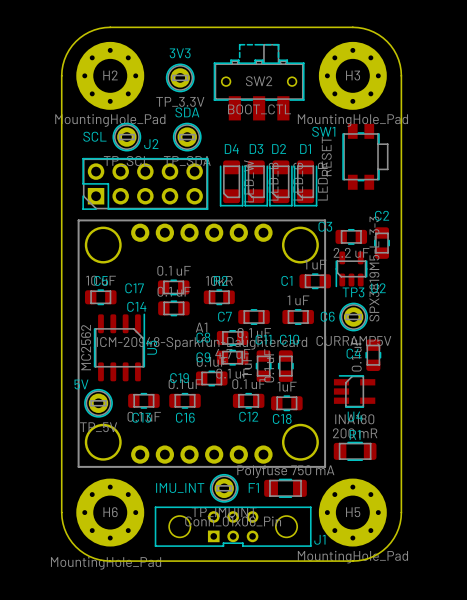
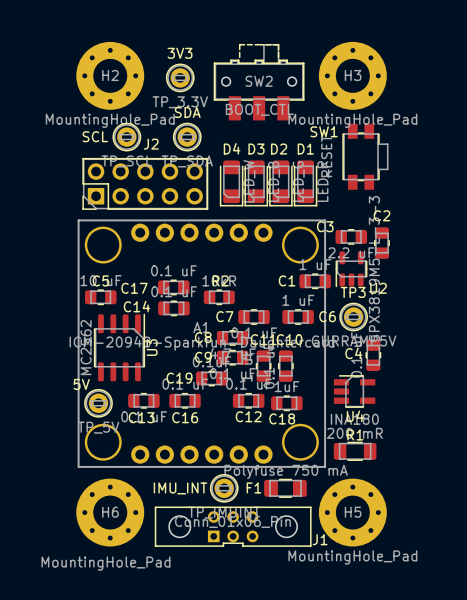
board edge: (110, 27) (358, 27) (368, 30) (383, 37) (396, 54) (401, 75) (401, 512) (398, 528) (393, 538) (383, 550) (373, 556) (352, 561) (104, 560) (94, 558) (79, 550) (66, 533) (61, 512) (62, 70) (69, 50) (79, 37) (94, 30) (110, 27) -> none

